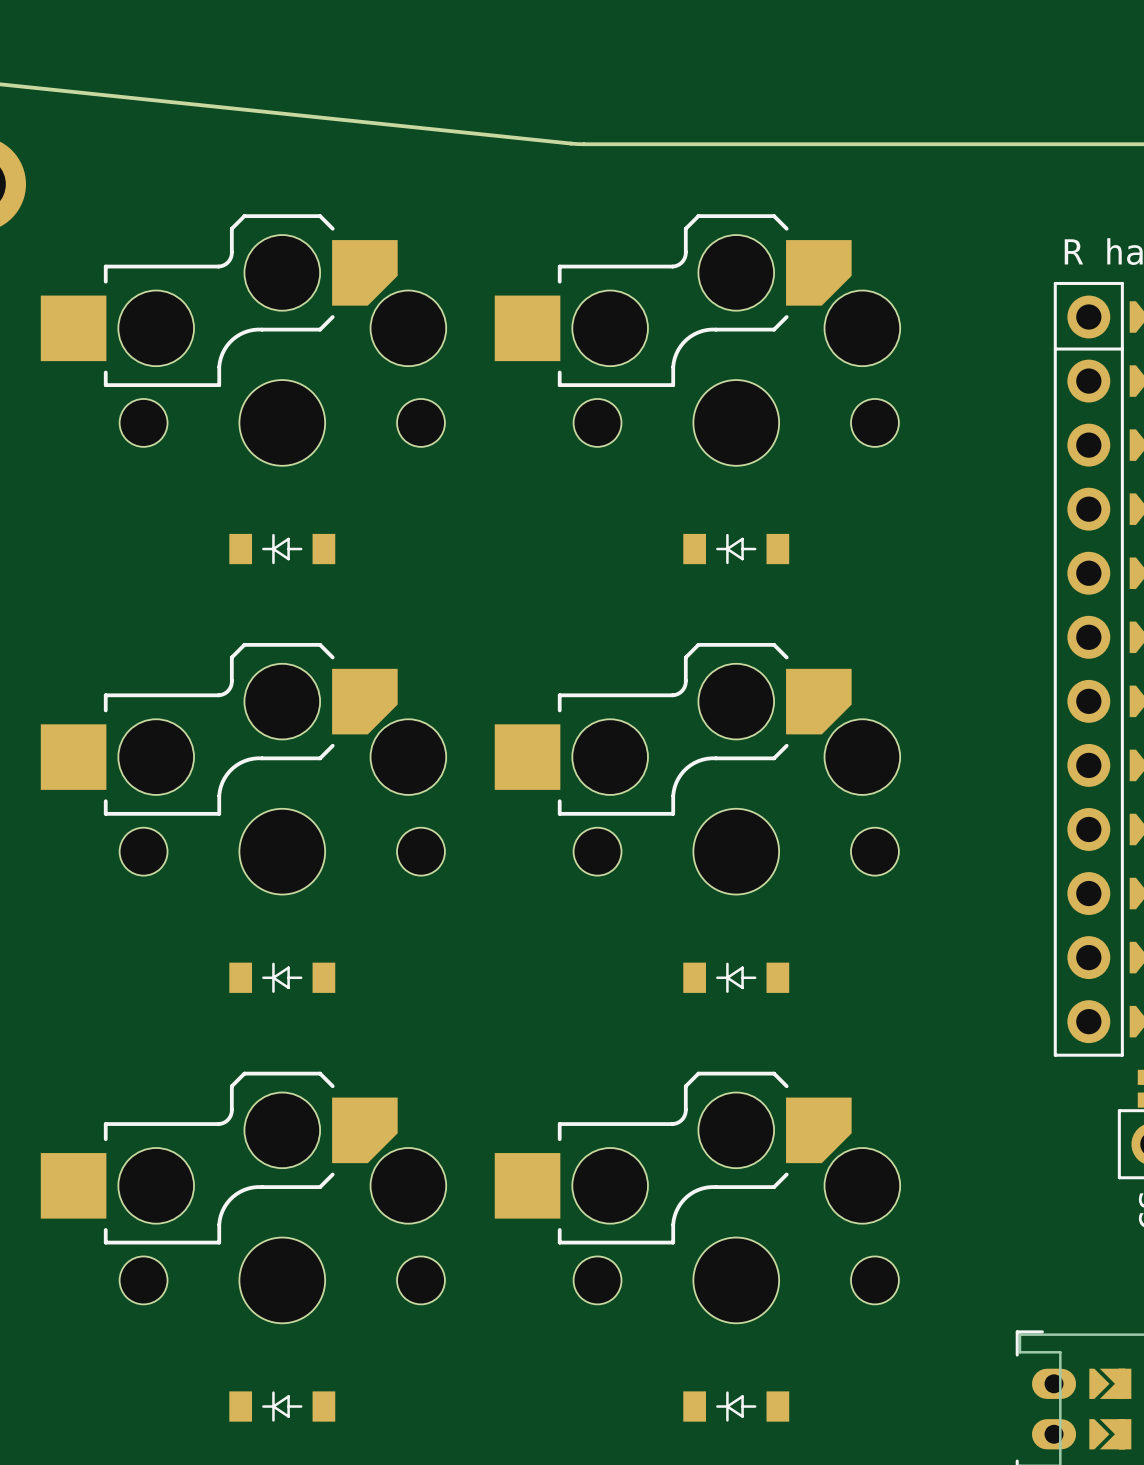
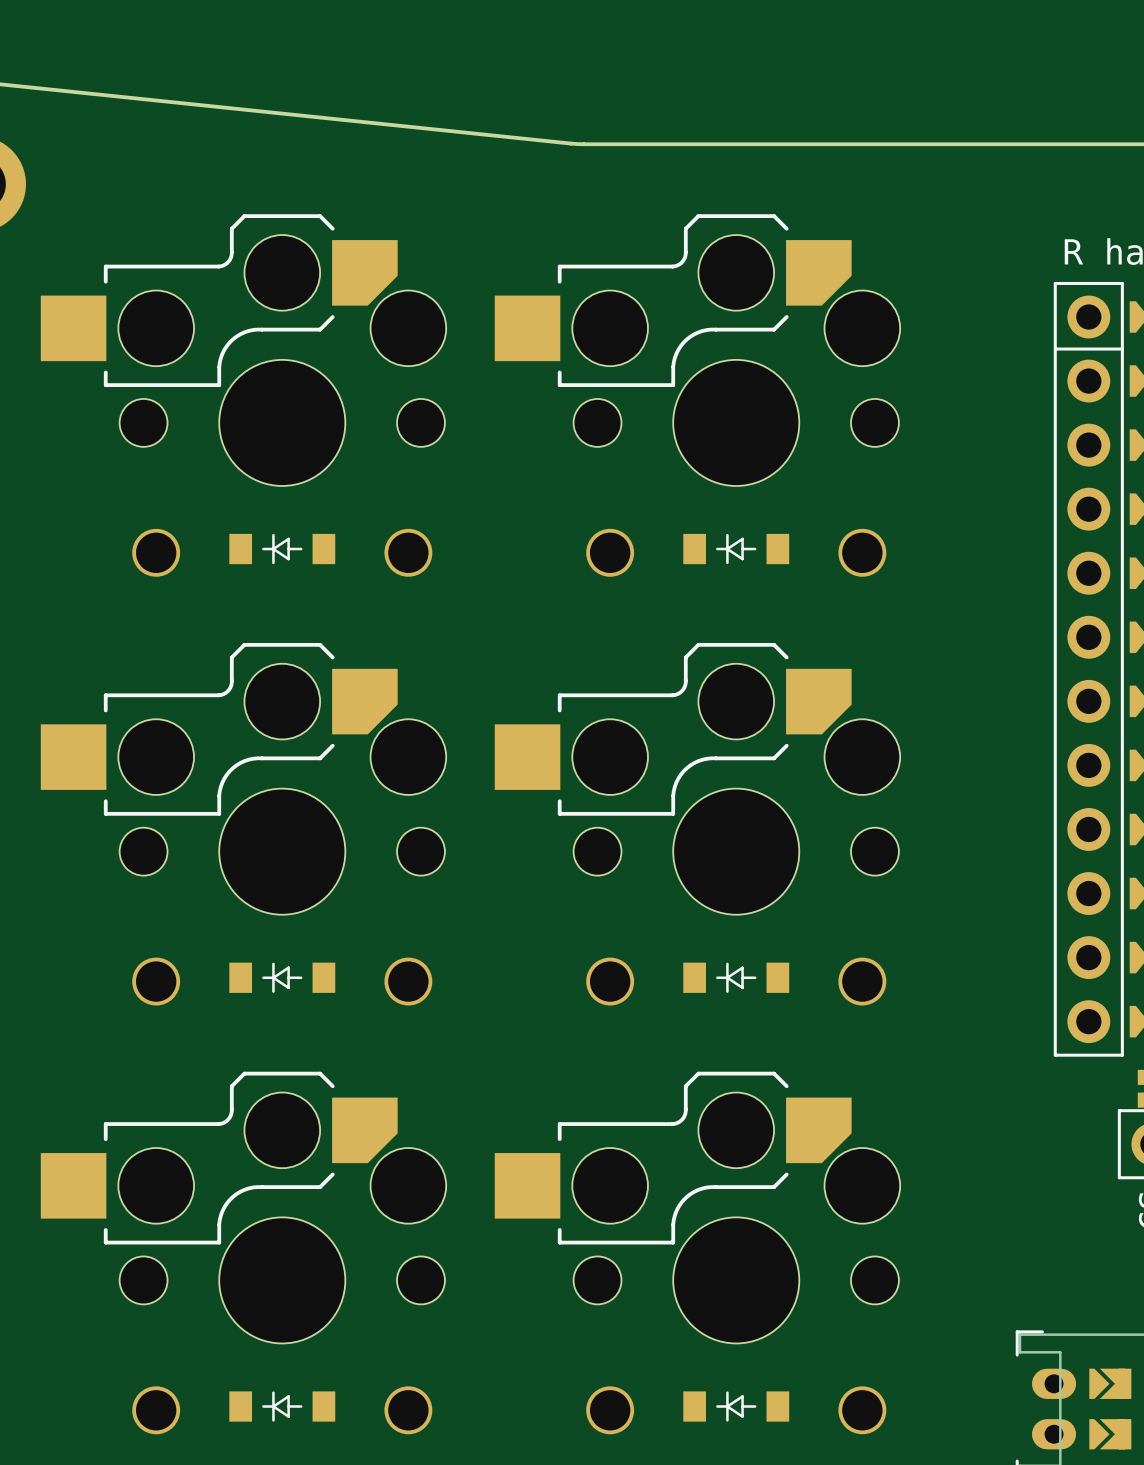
part: (243, 340) -> none
part: (697, 340) -> none
part: none -> (243, 395)
part: none -> (697, 395)
part: (243, 768) -> none
part: (697, 768) -> none
part: none -> (243, 824)
part: none -> (697, 824)
part: (243, 1197) -> none
part: (697, 1197) -> none
part: none -> (243, 1252)
part: none -> (697, 1252)

